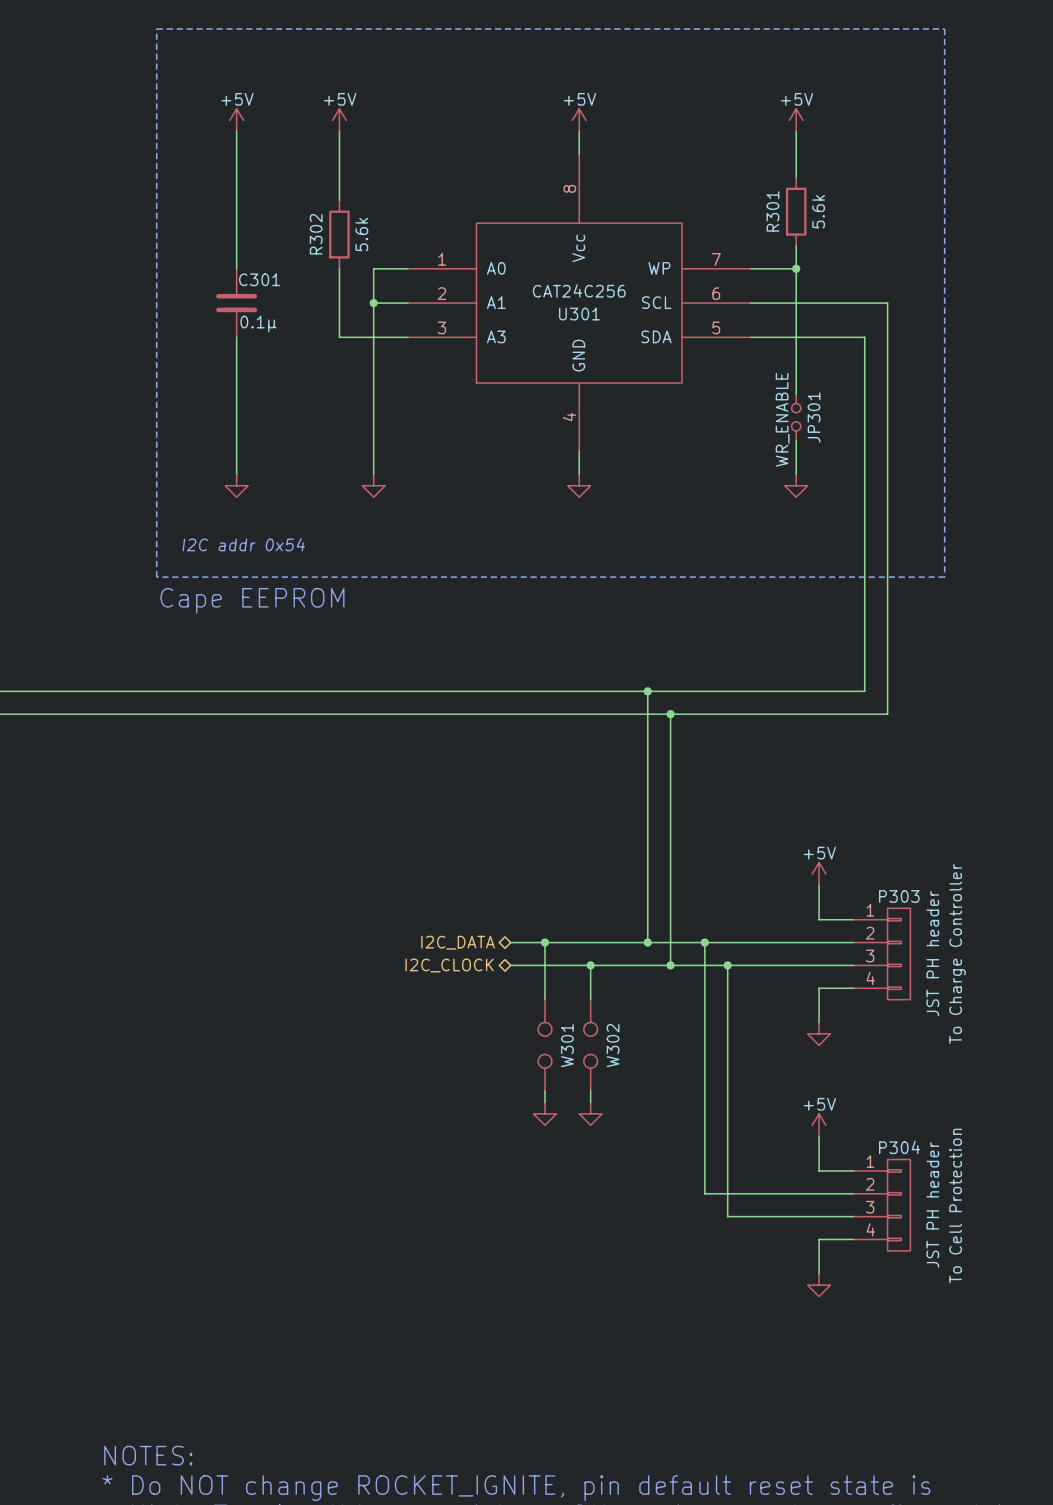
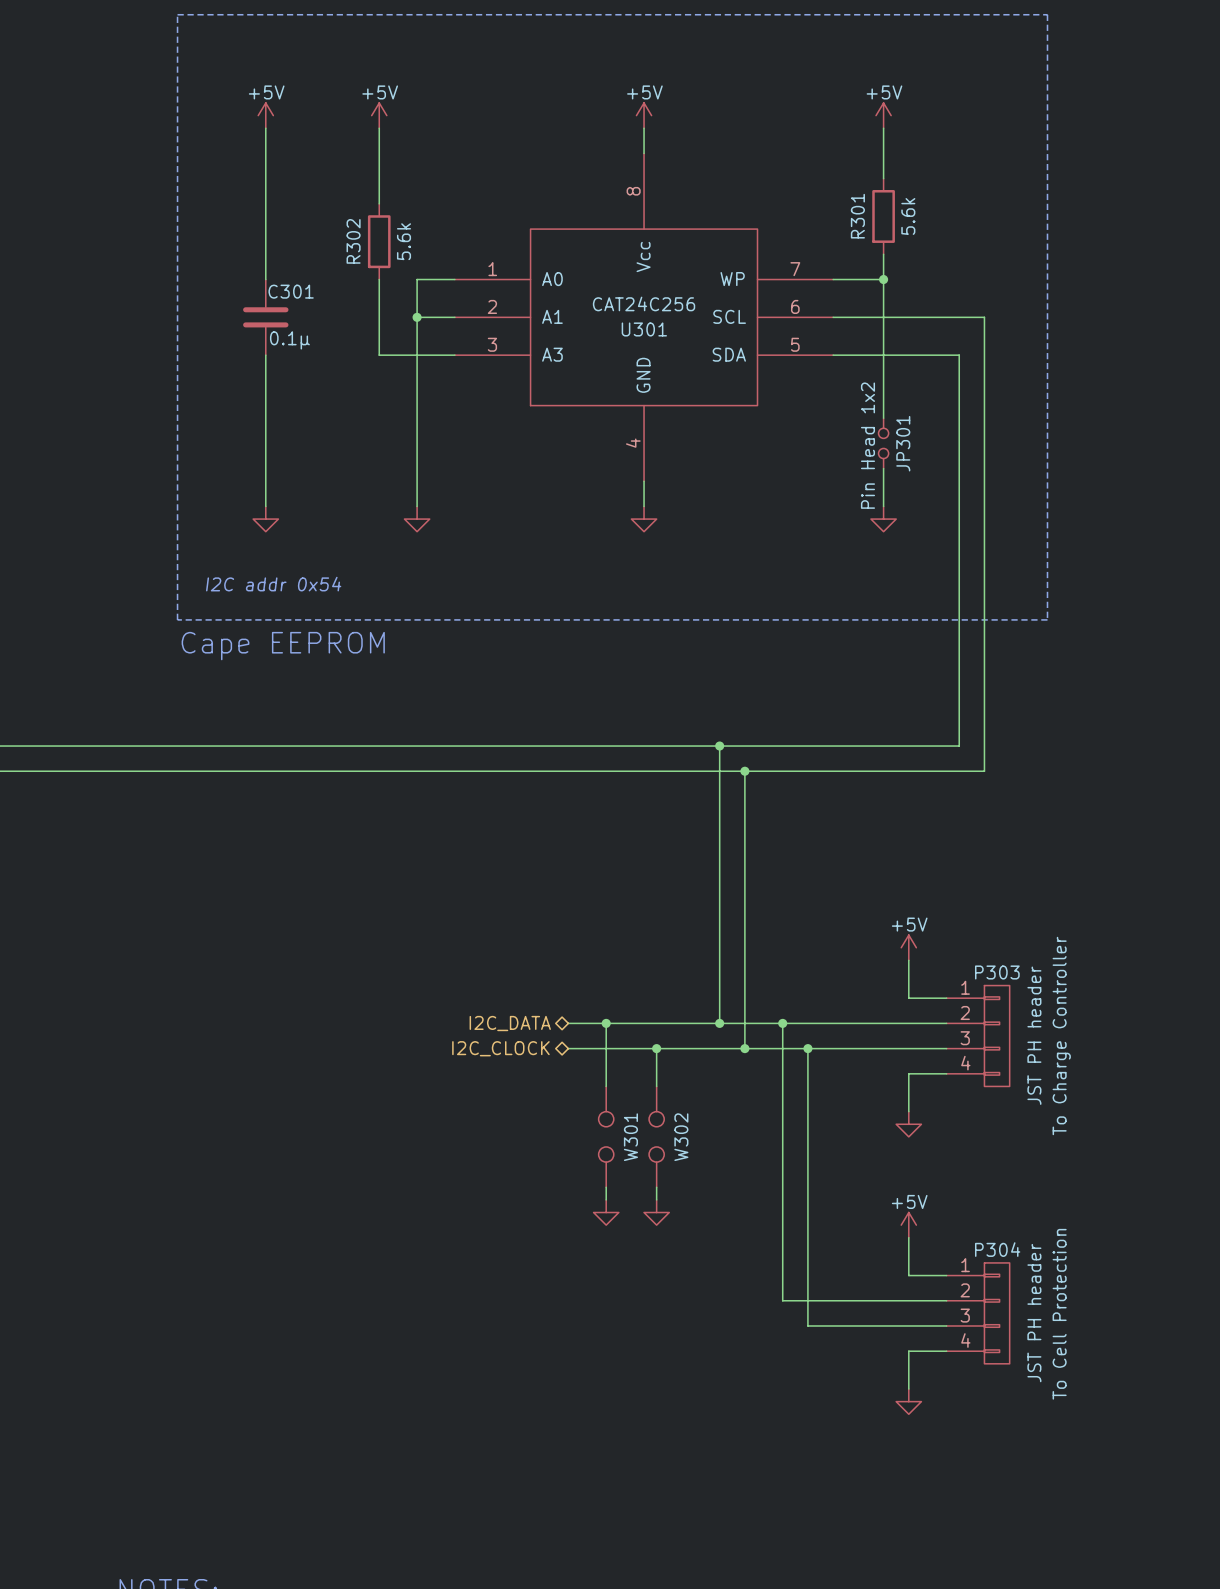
JP301 value: WR_ENABLE (782, 419) -> Pin Head 1x2 (867, 445)

